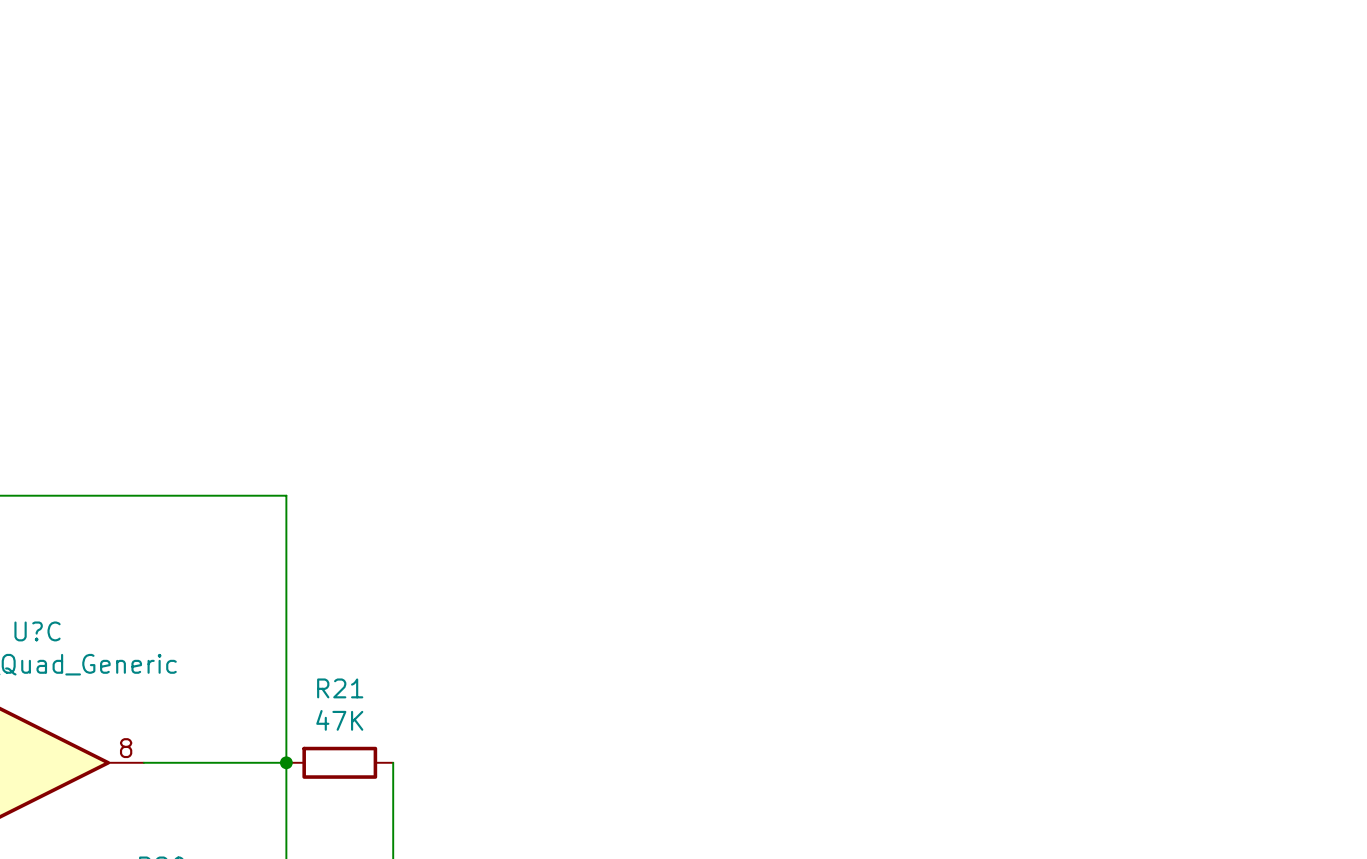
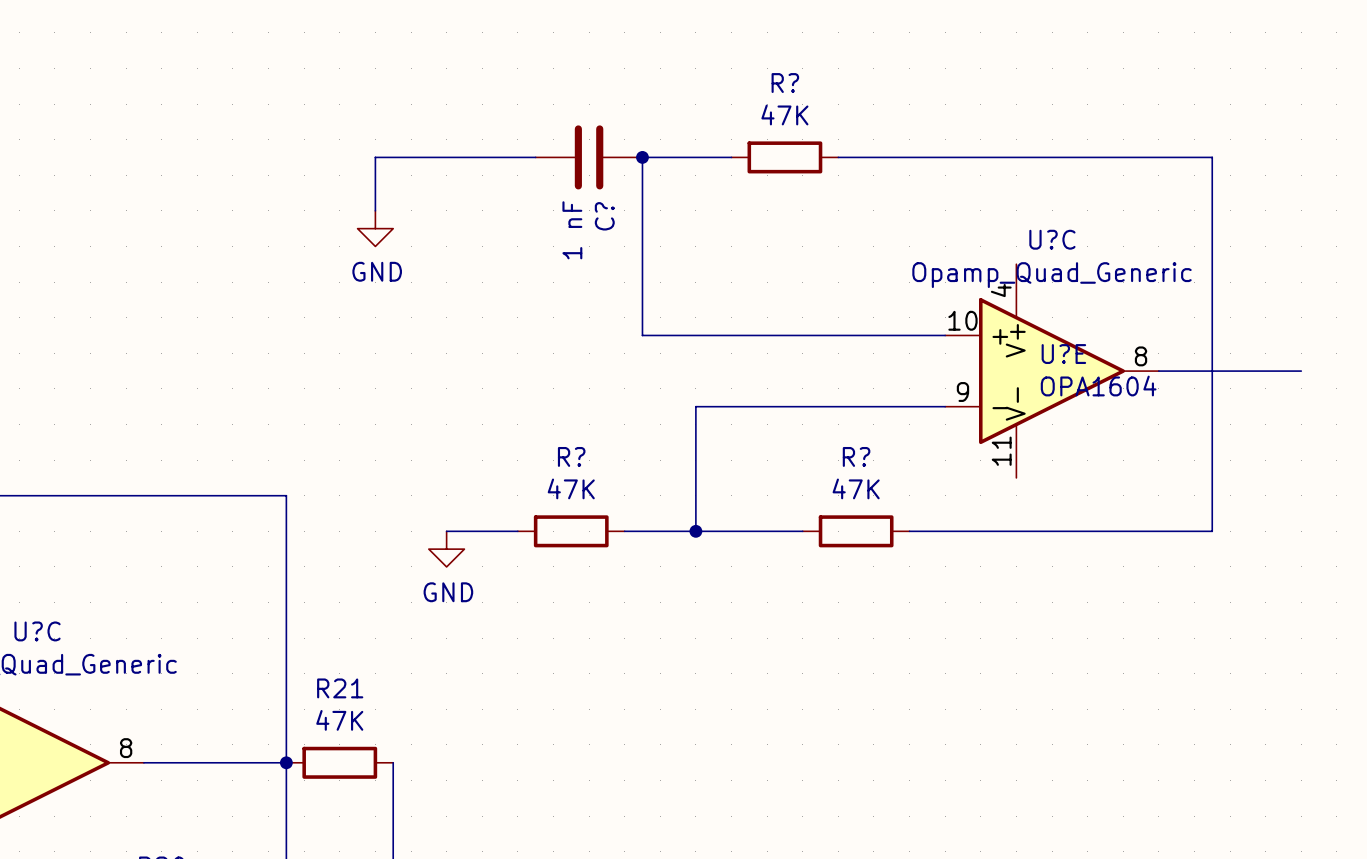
wire: none -> (535, 157) (375, 157) (375, 210)
C?: none -> 1 nF (589, 157)
junction: none -> (642, 157)
wire: none -> (731, 157) (642, 157) (642, 335) (945, 335)
R?: none -> 47K (784, 157)
wire: none -> (838, 157) (1212, 157) (1212, 531) (909, 531)
power symbol: none -> GND (375, 228)
U?E: none -> OPA1604 (1016, 371)
U?C: none -> Opamp_Quad_Generic (1052, 371)
wire: none -> (1158, 371) (1301, 371)
wire: none -> (945, 406) (695, 406) (695, 531)
wire: none -> (446, 531) (517, 531)
R?: none -> 47K (571, 531)
wire: none -> (624, 531) (802, 531)
junction: none -> (695, 531)
R?: none -> 47K (856, 531)
power symbol: none -> GND (446, 549)

